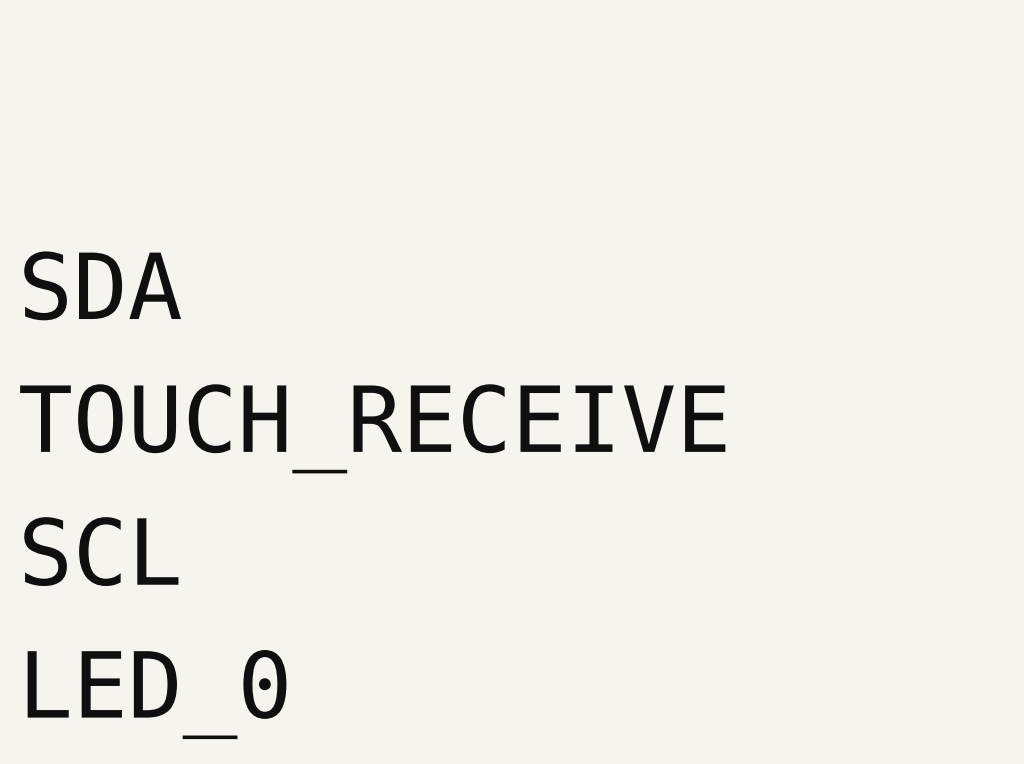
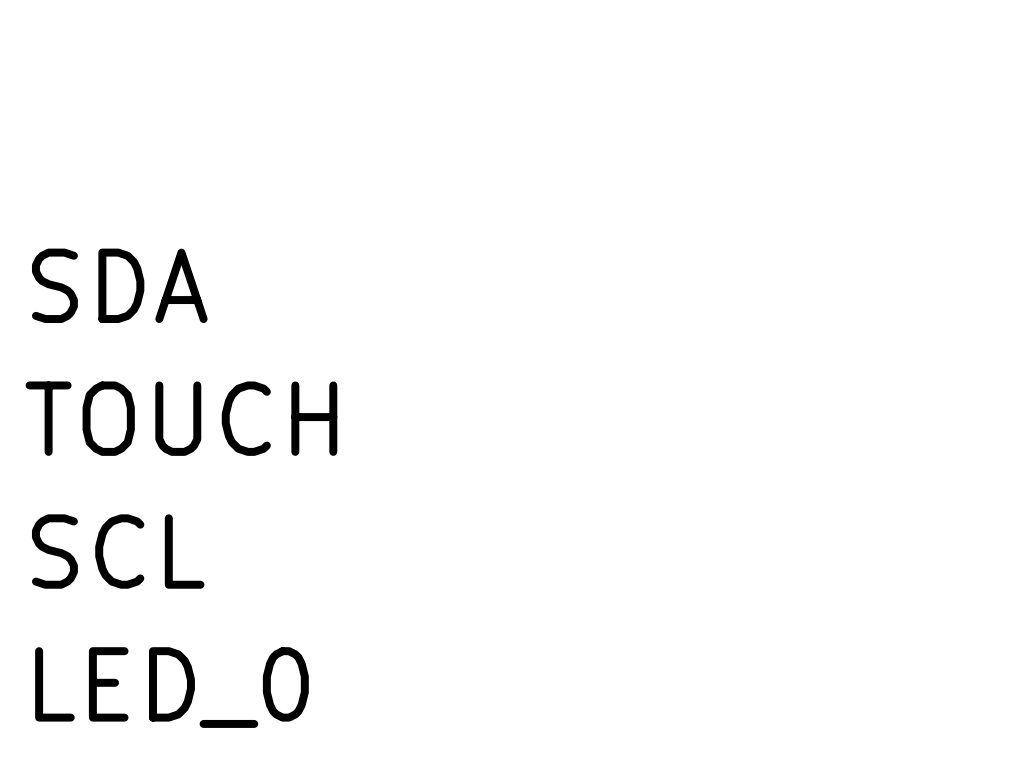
label: TOUCH_RECEIVE (372, 428) -> TOUCH (181, 418)

